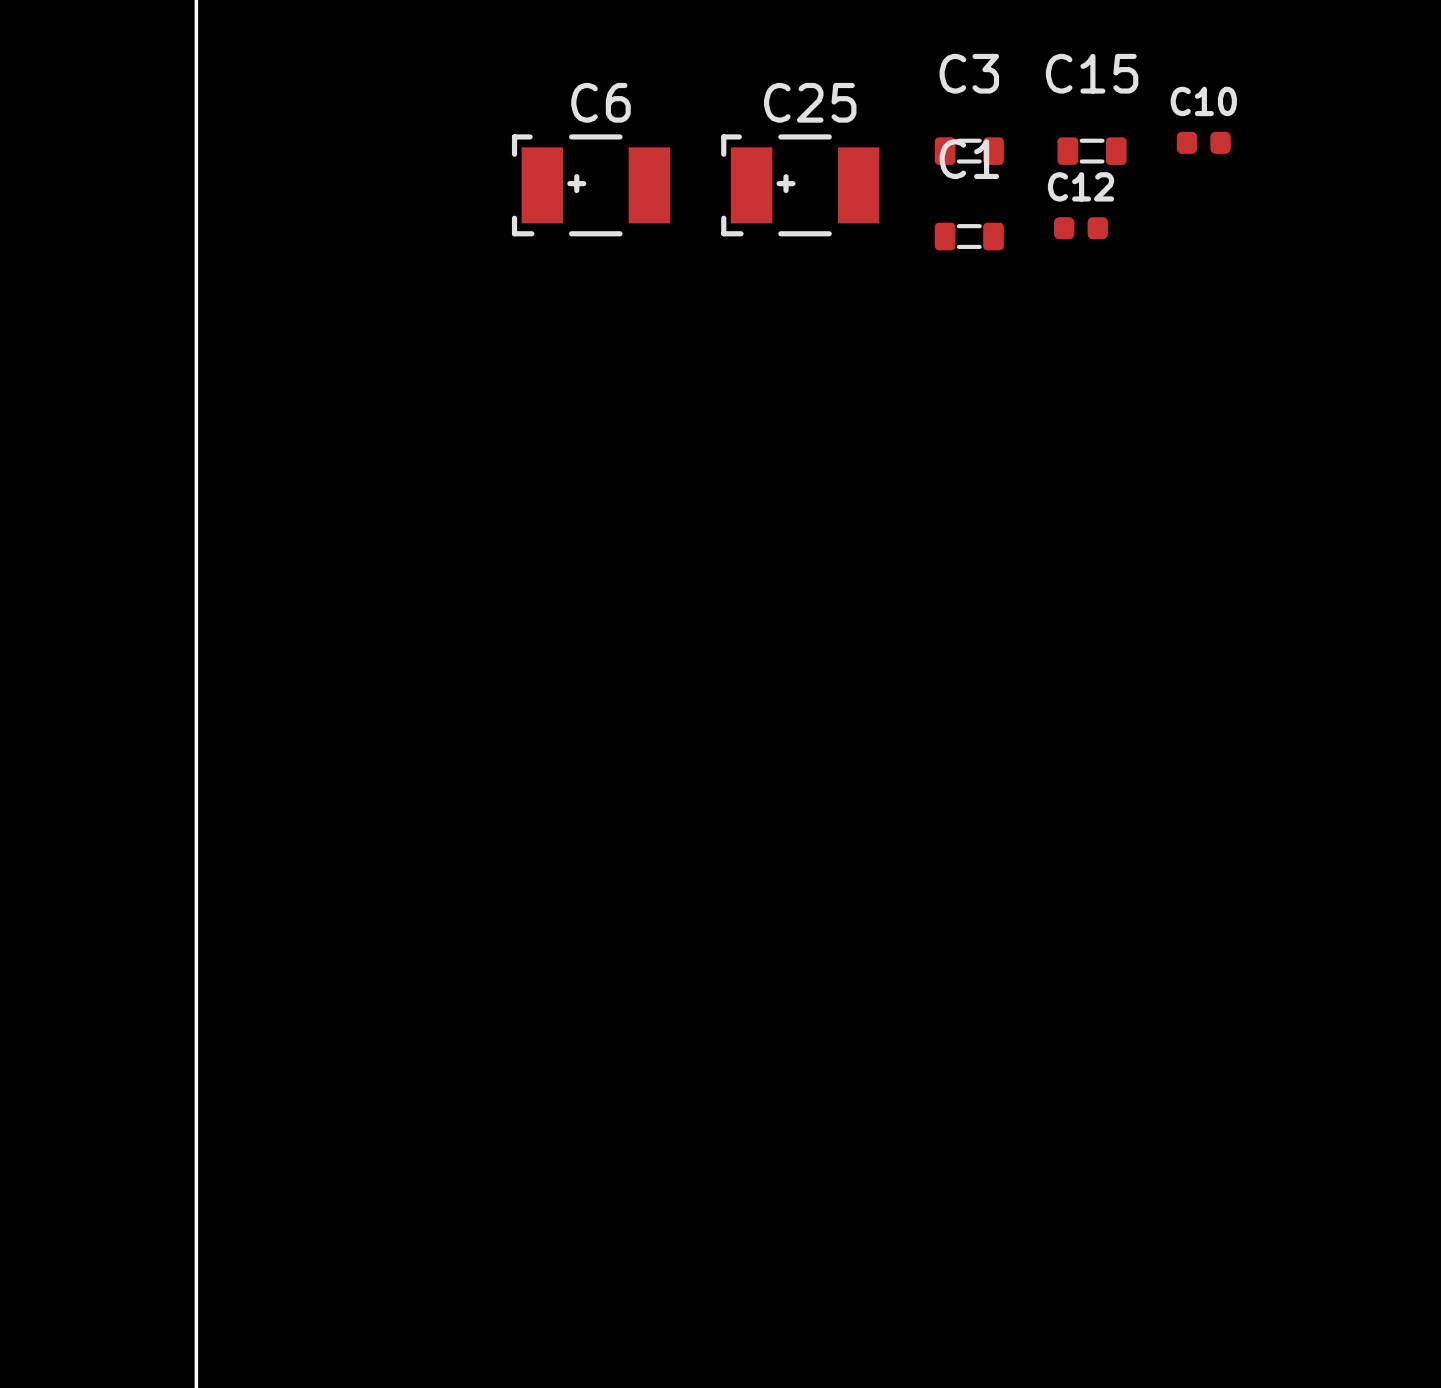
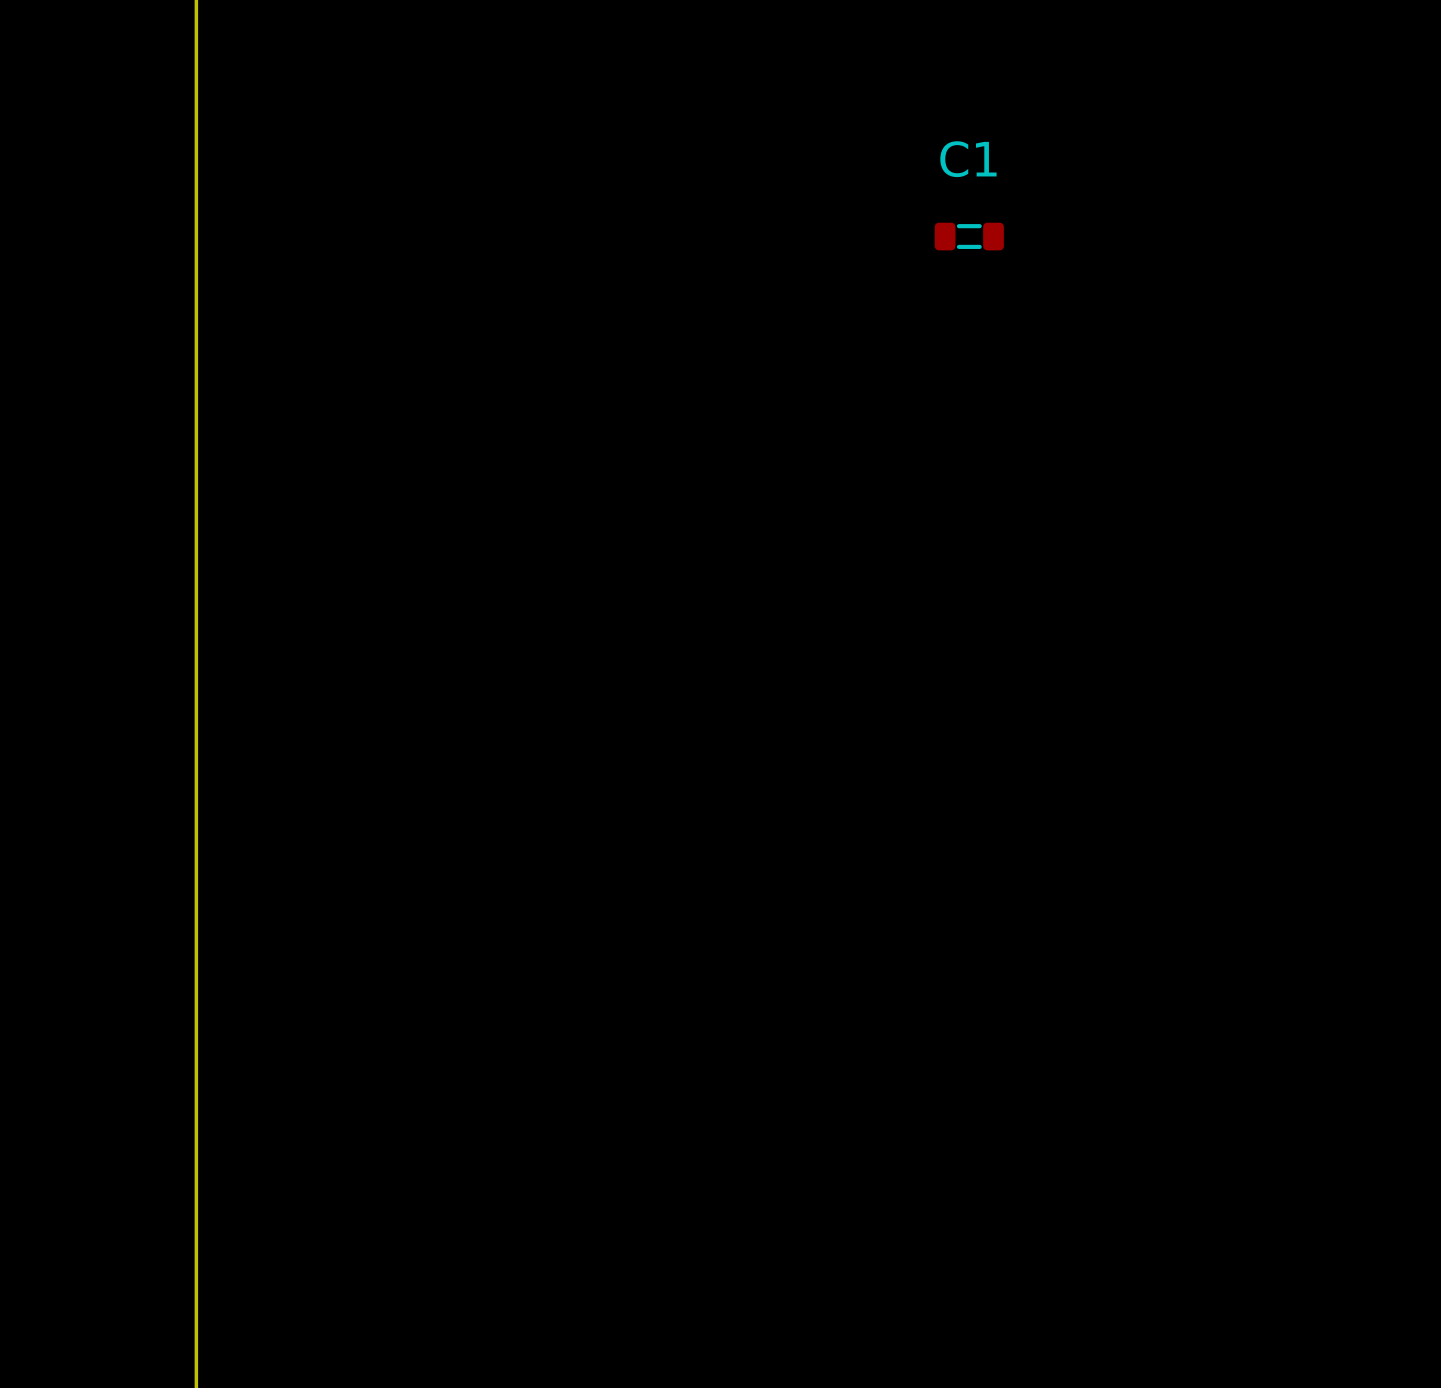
C10: (1203, 142) -> none
C3: (969, 151) -> none
C15: (1092, 151) -> none
C6: (591, 185) -> none
C25: (800, 185) -> none
C12: (1081, 228) -> none

